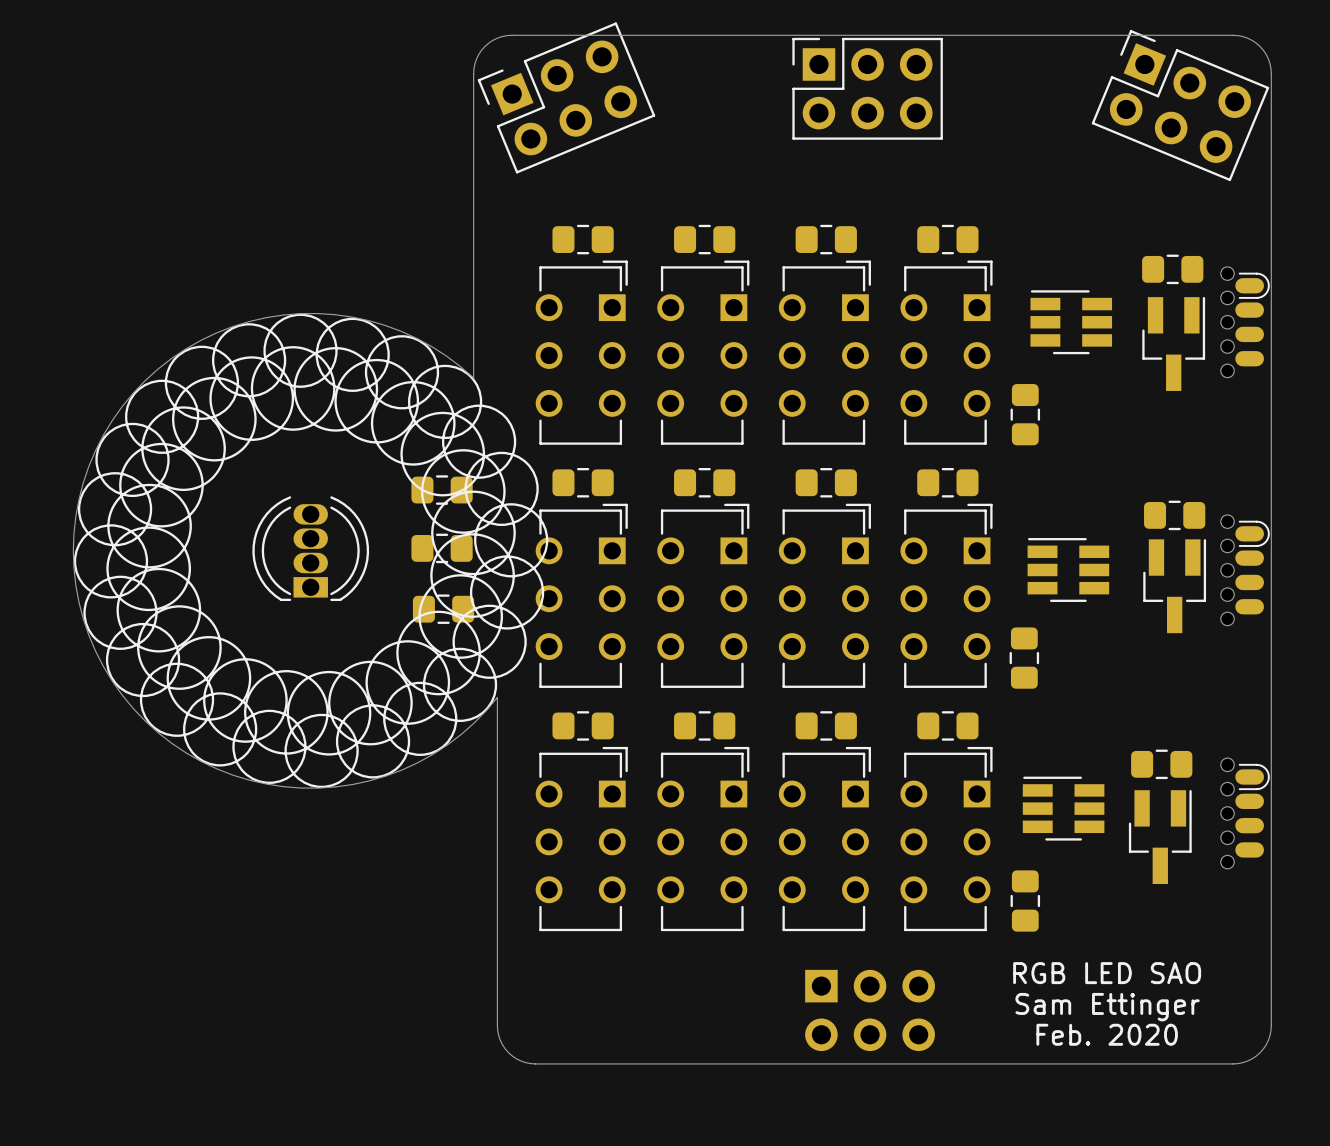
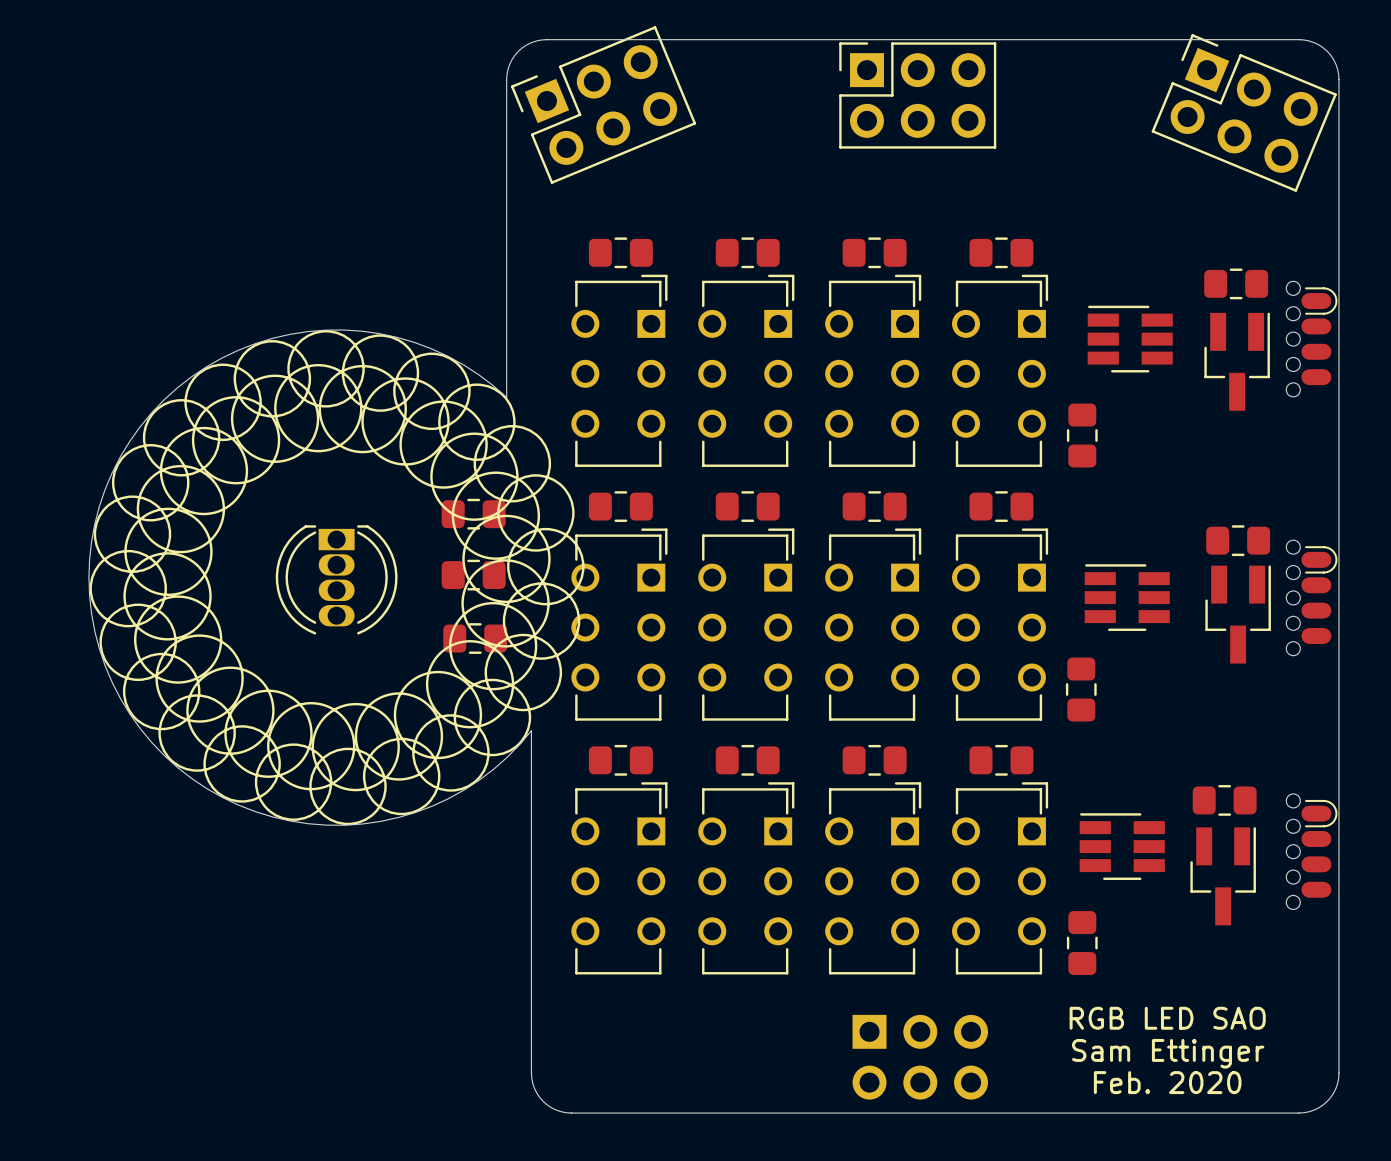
part rotation: 0° (310, 548) -> 180° (336, 579)

